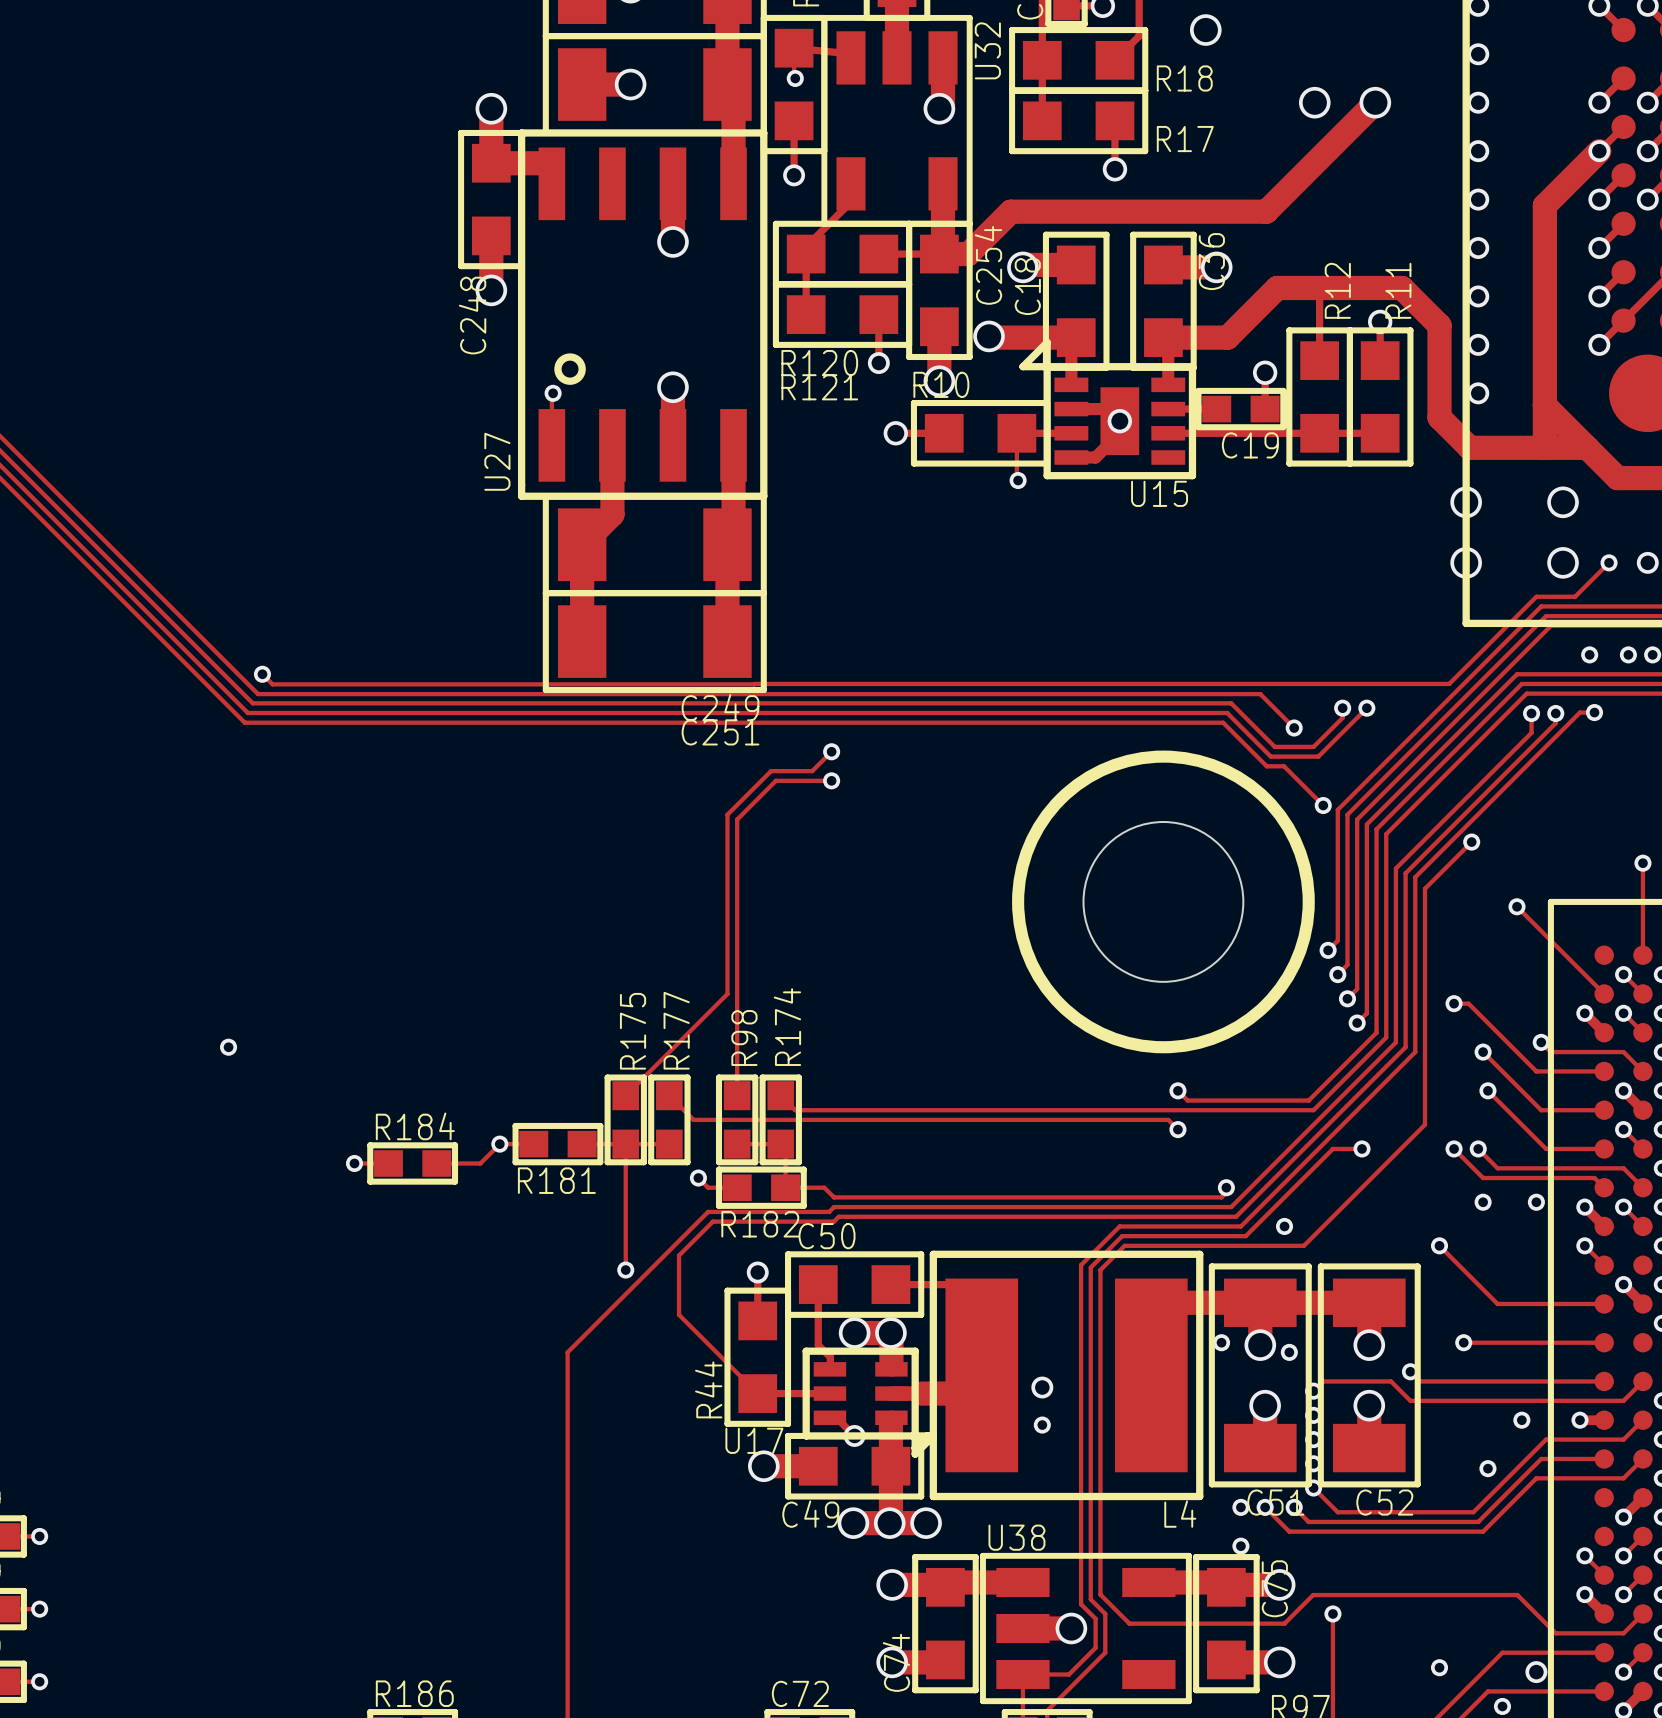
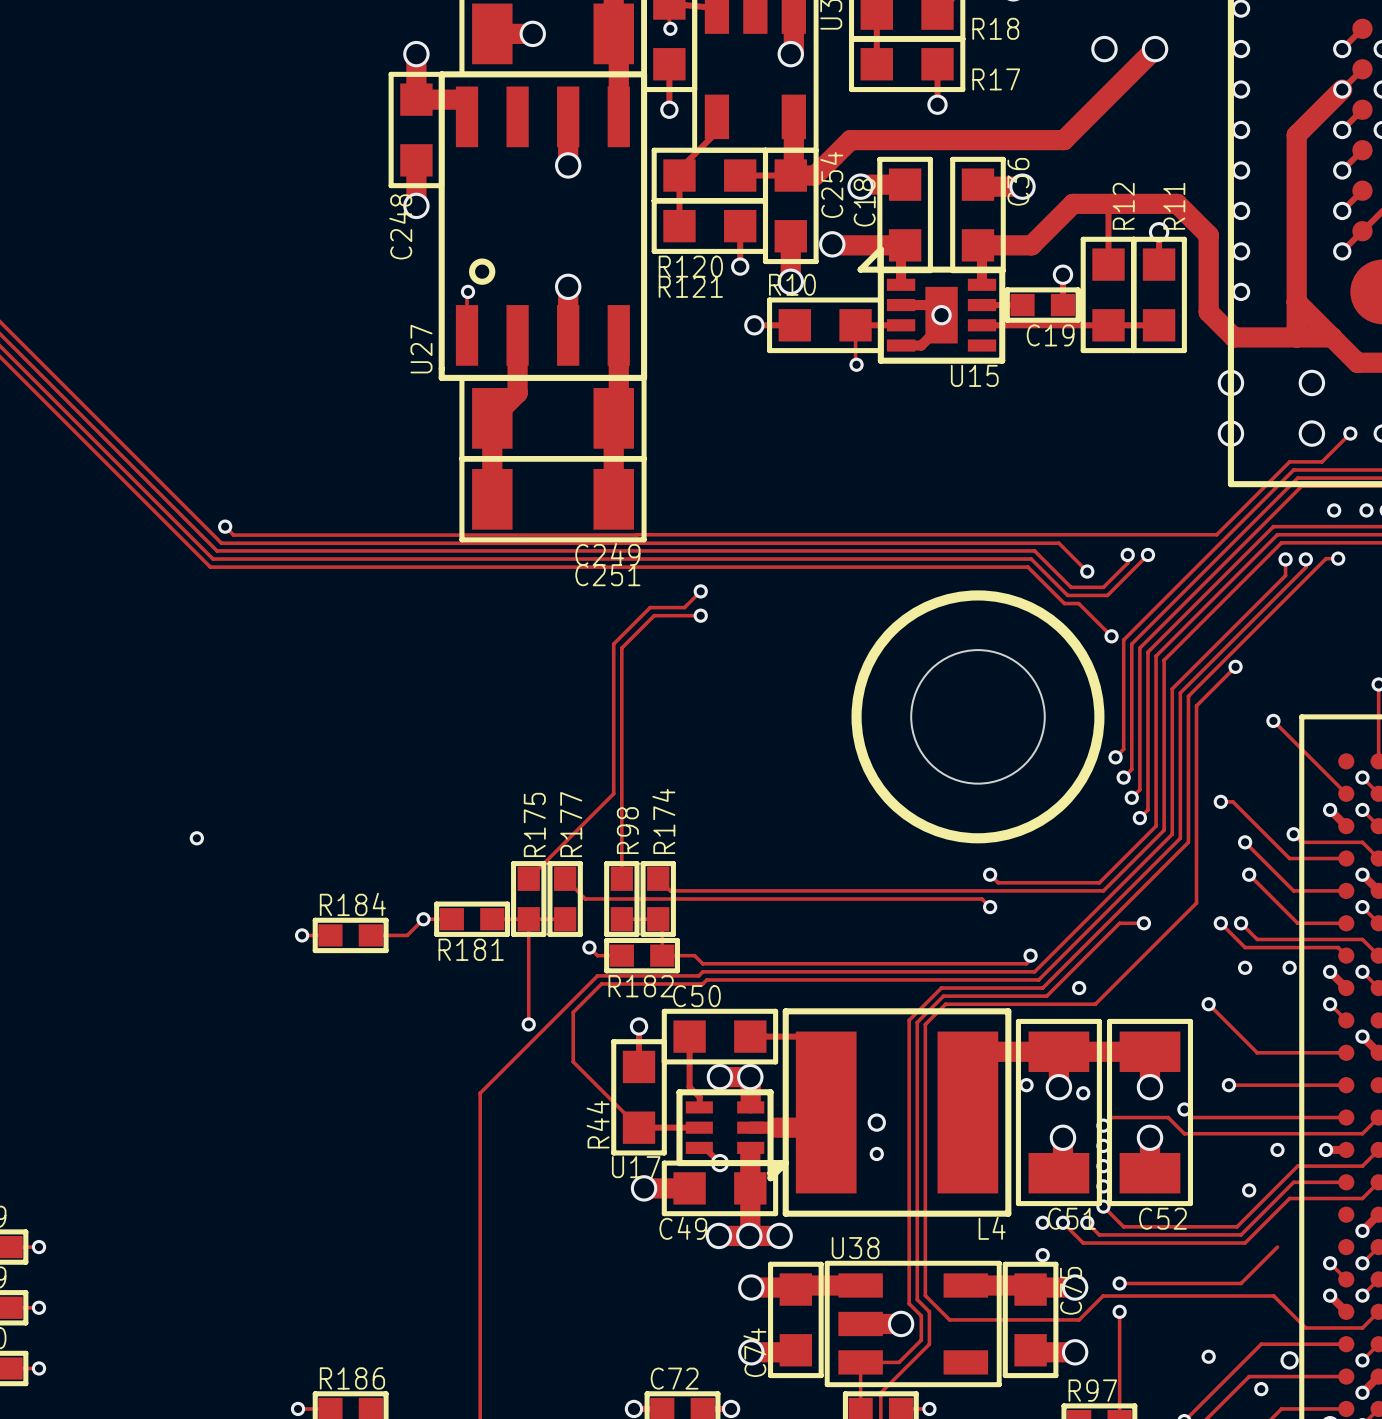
track: none -> (1277, 1247) (1241, 1283) (1119, 1283)
via: none -> (1119, 1283)

